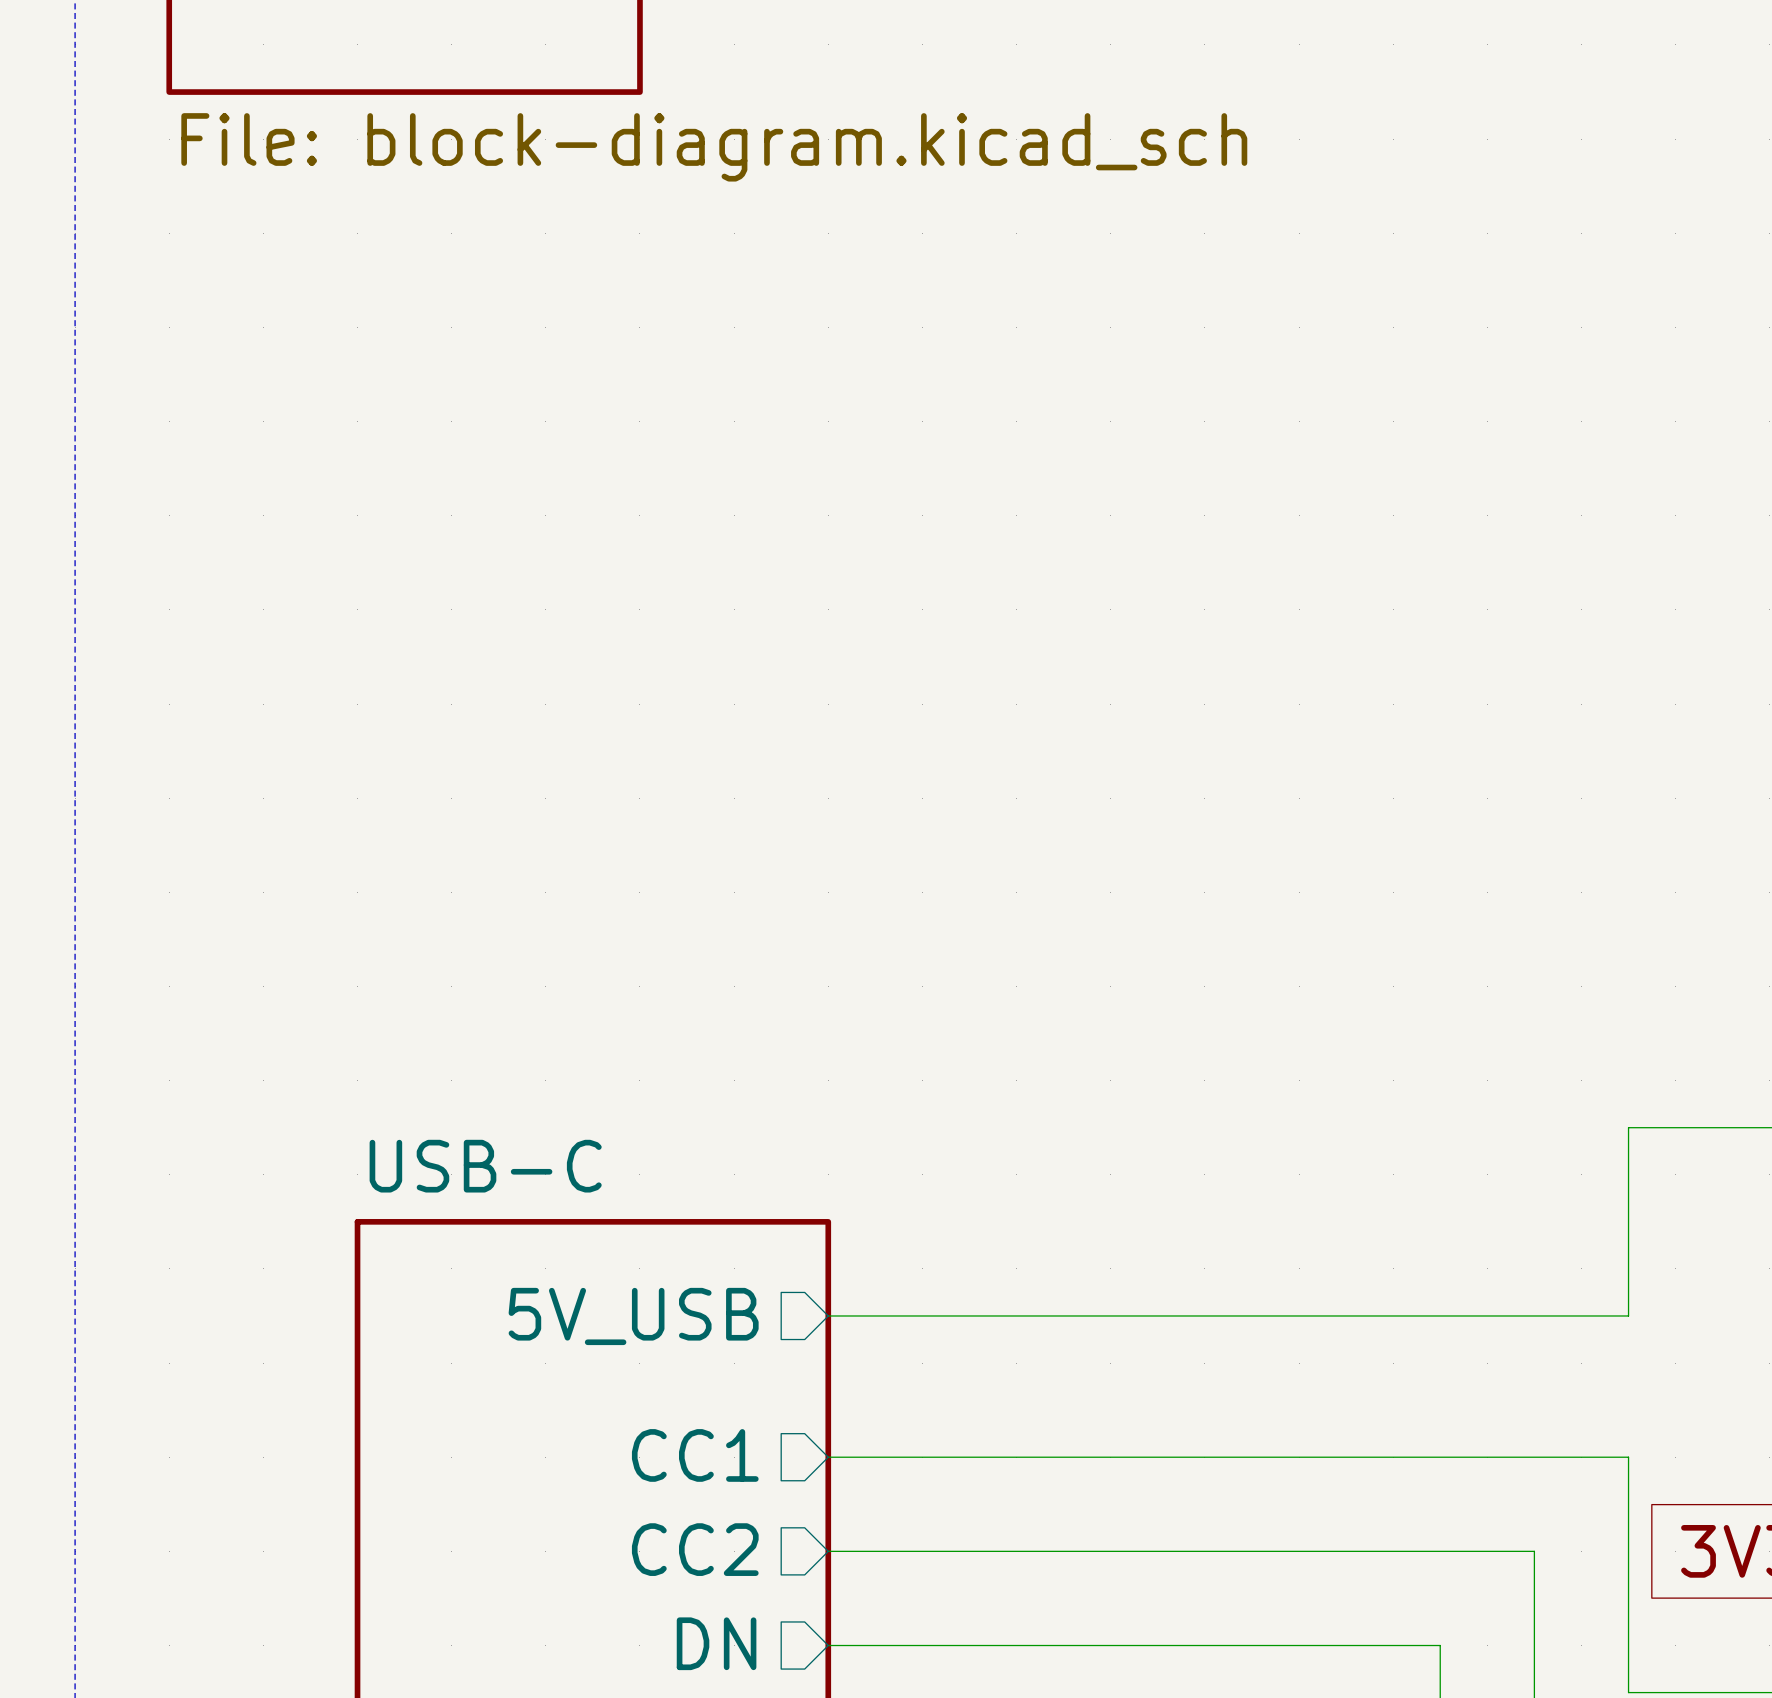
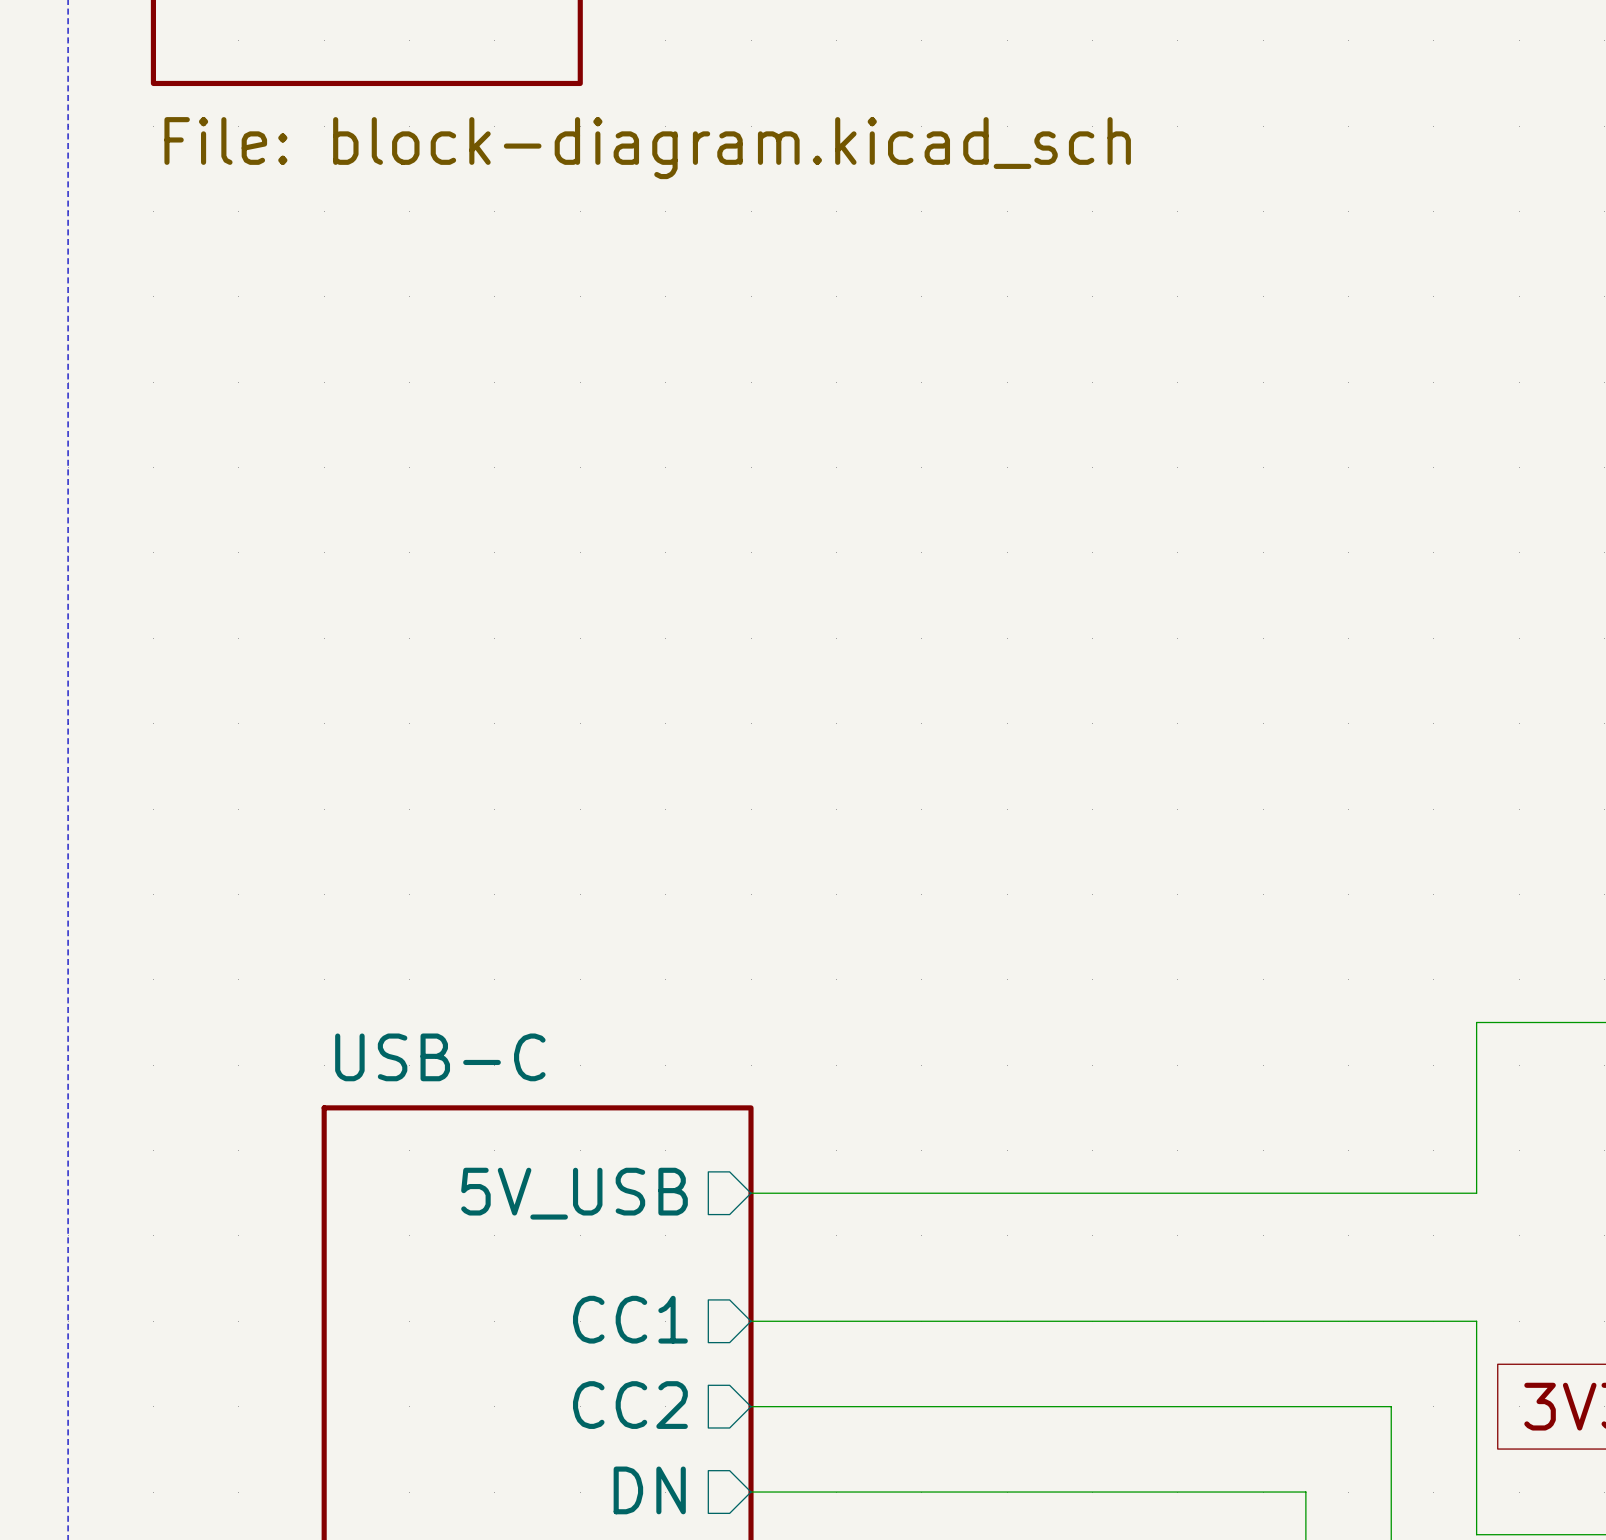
sheet value position: File: block-diagram.kicad_sch (714, 147) -> File: block-diagram.kicad_sch (647, 148)

